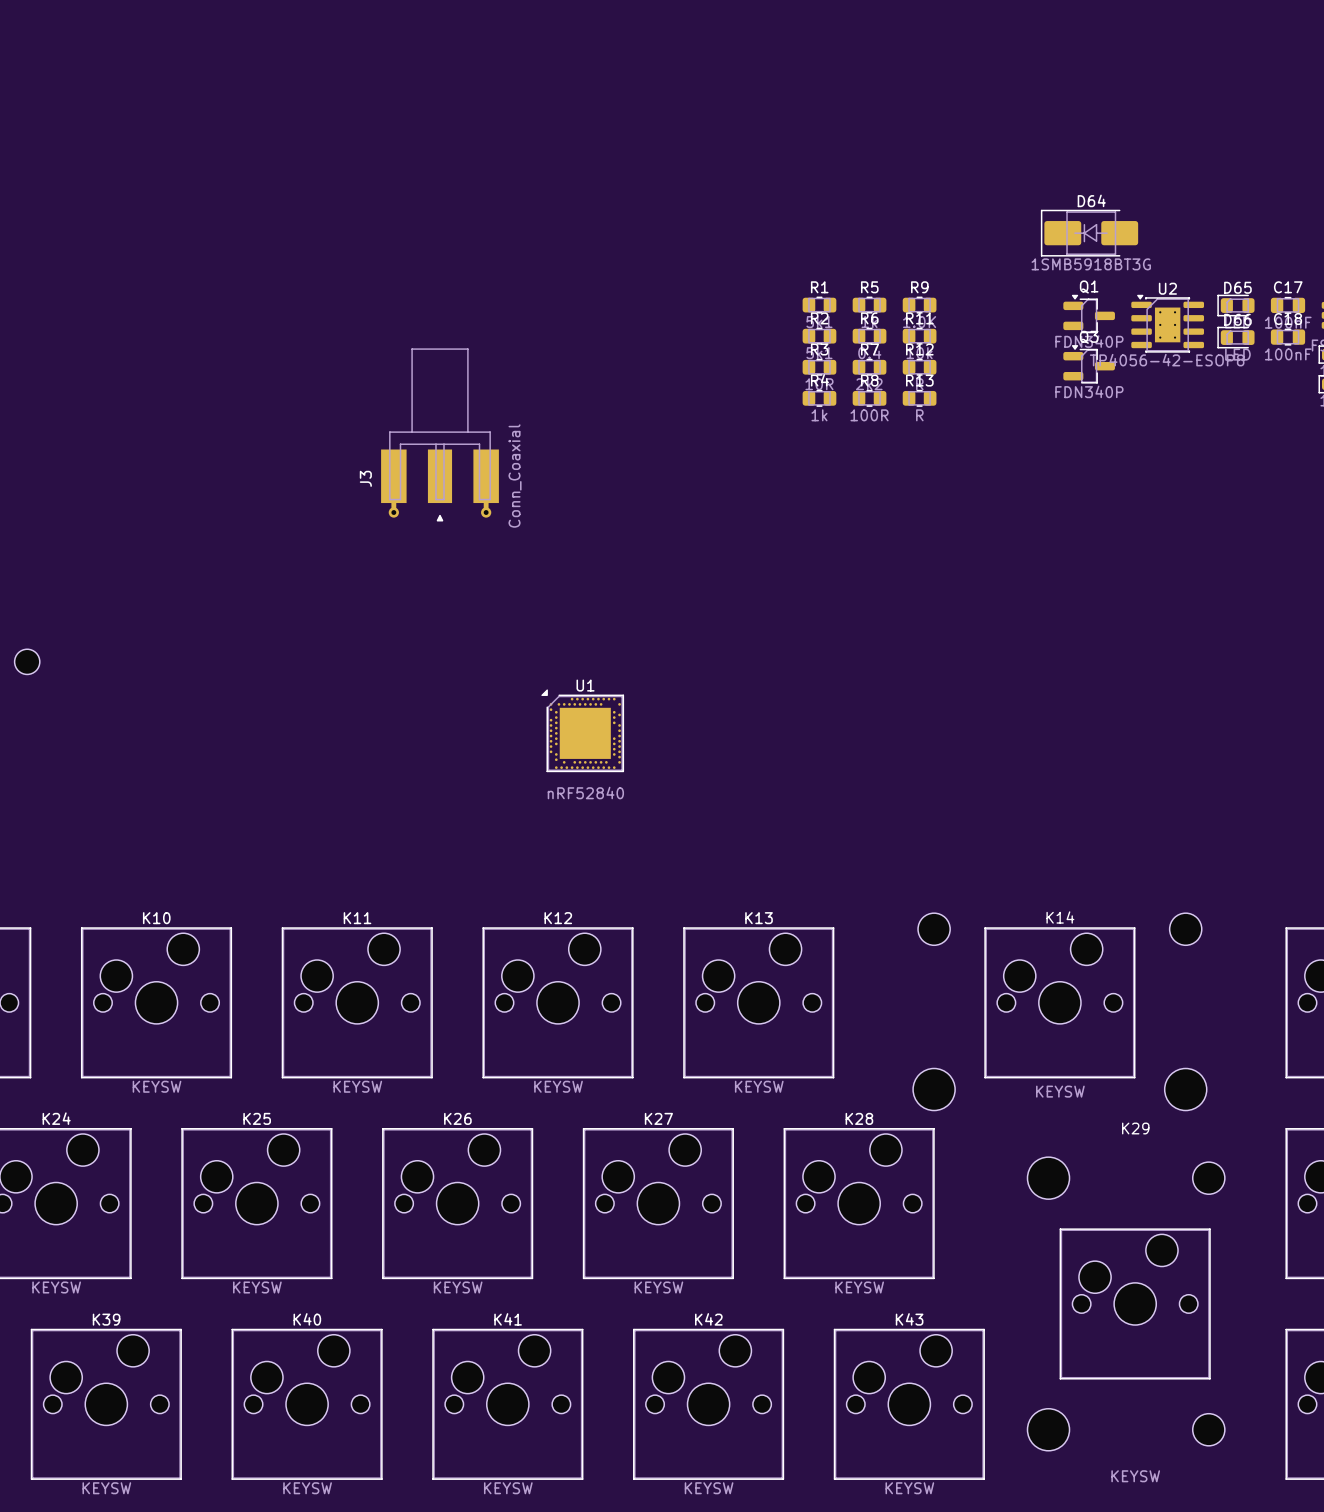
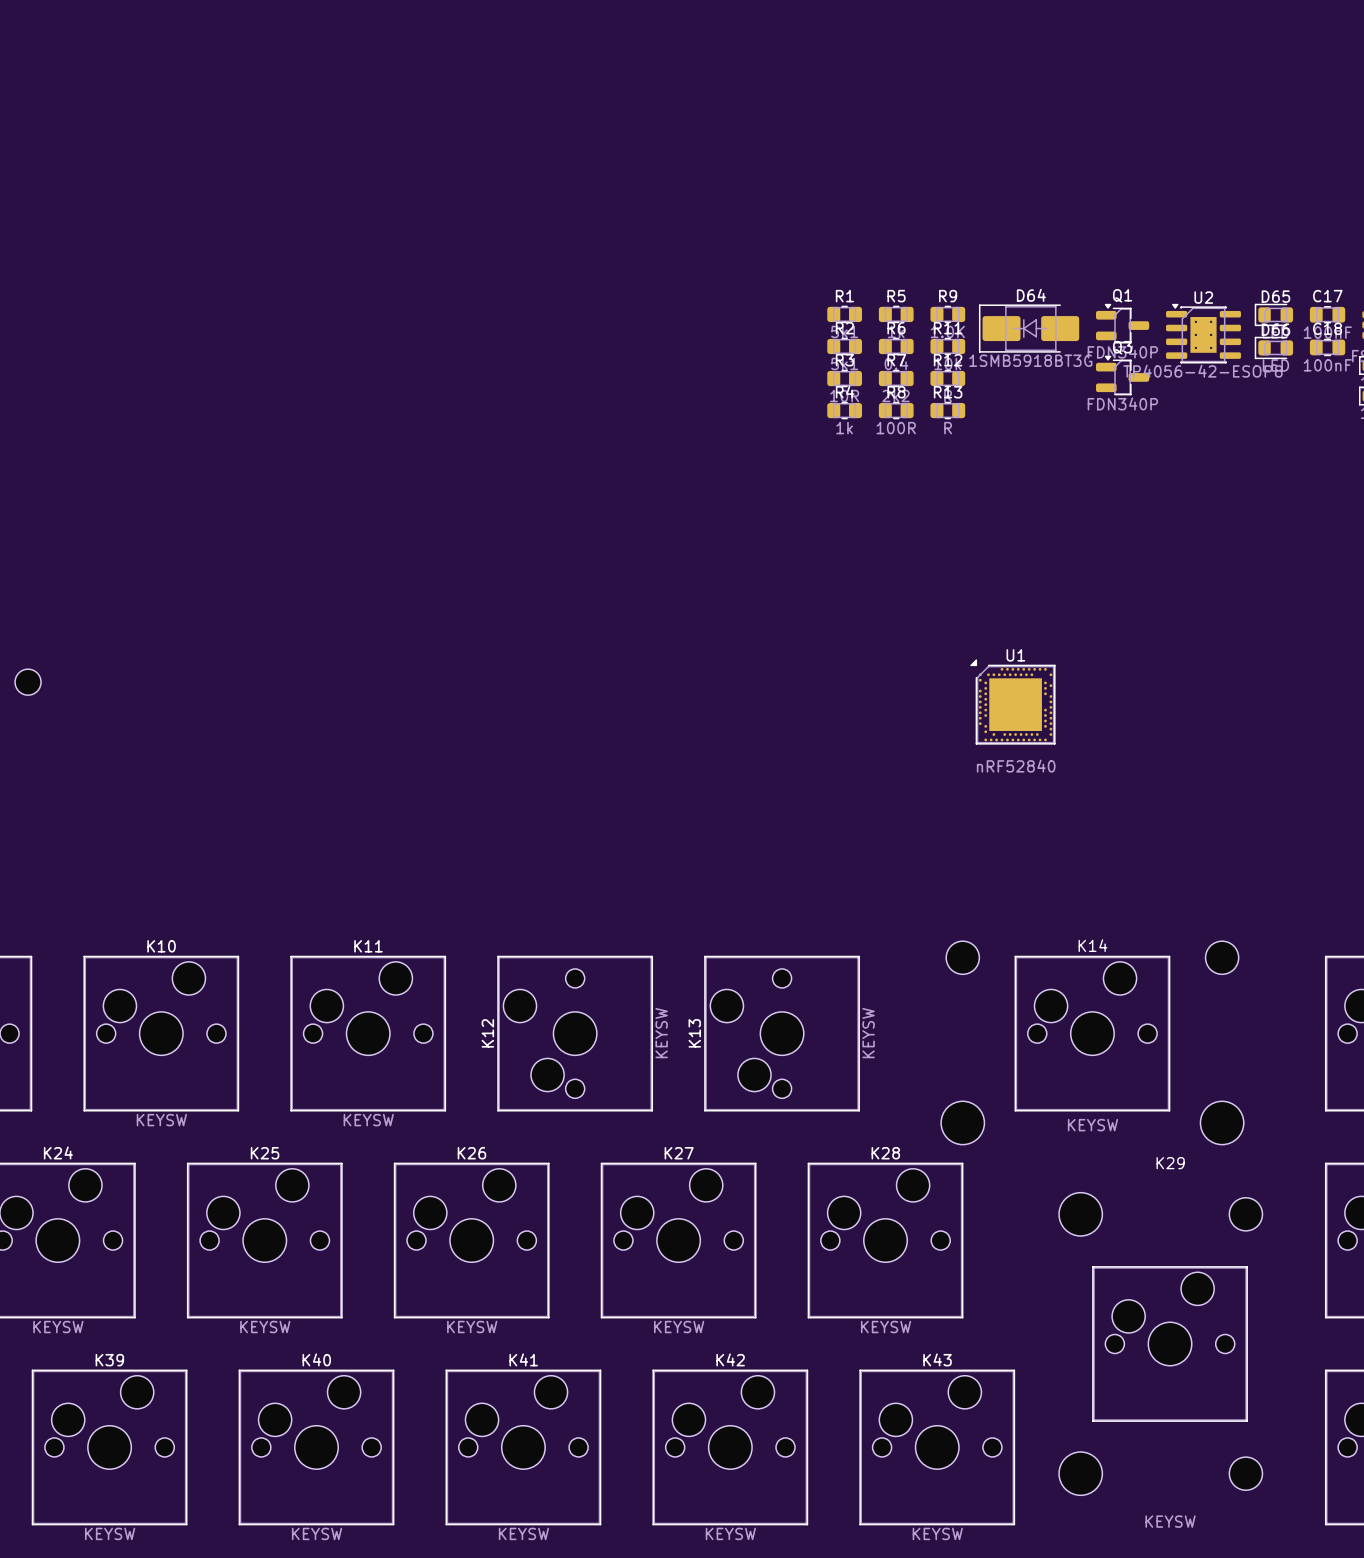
D64 position: (1089, 233) -> (1029, 328)
J3: Conn_Coaxial (439, 434) -> none
U1 position: (582, 730) -> (1012, 701)
K12 rotation: 0° (558, 1002) -> 90° counterclockwise (575, 1033)
K13 rotation: 0° (758, 1002) -> 90° counterclockwise (782, 1033)

